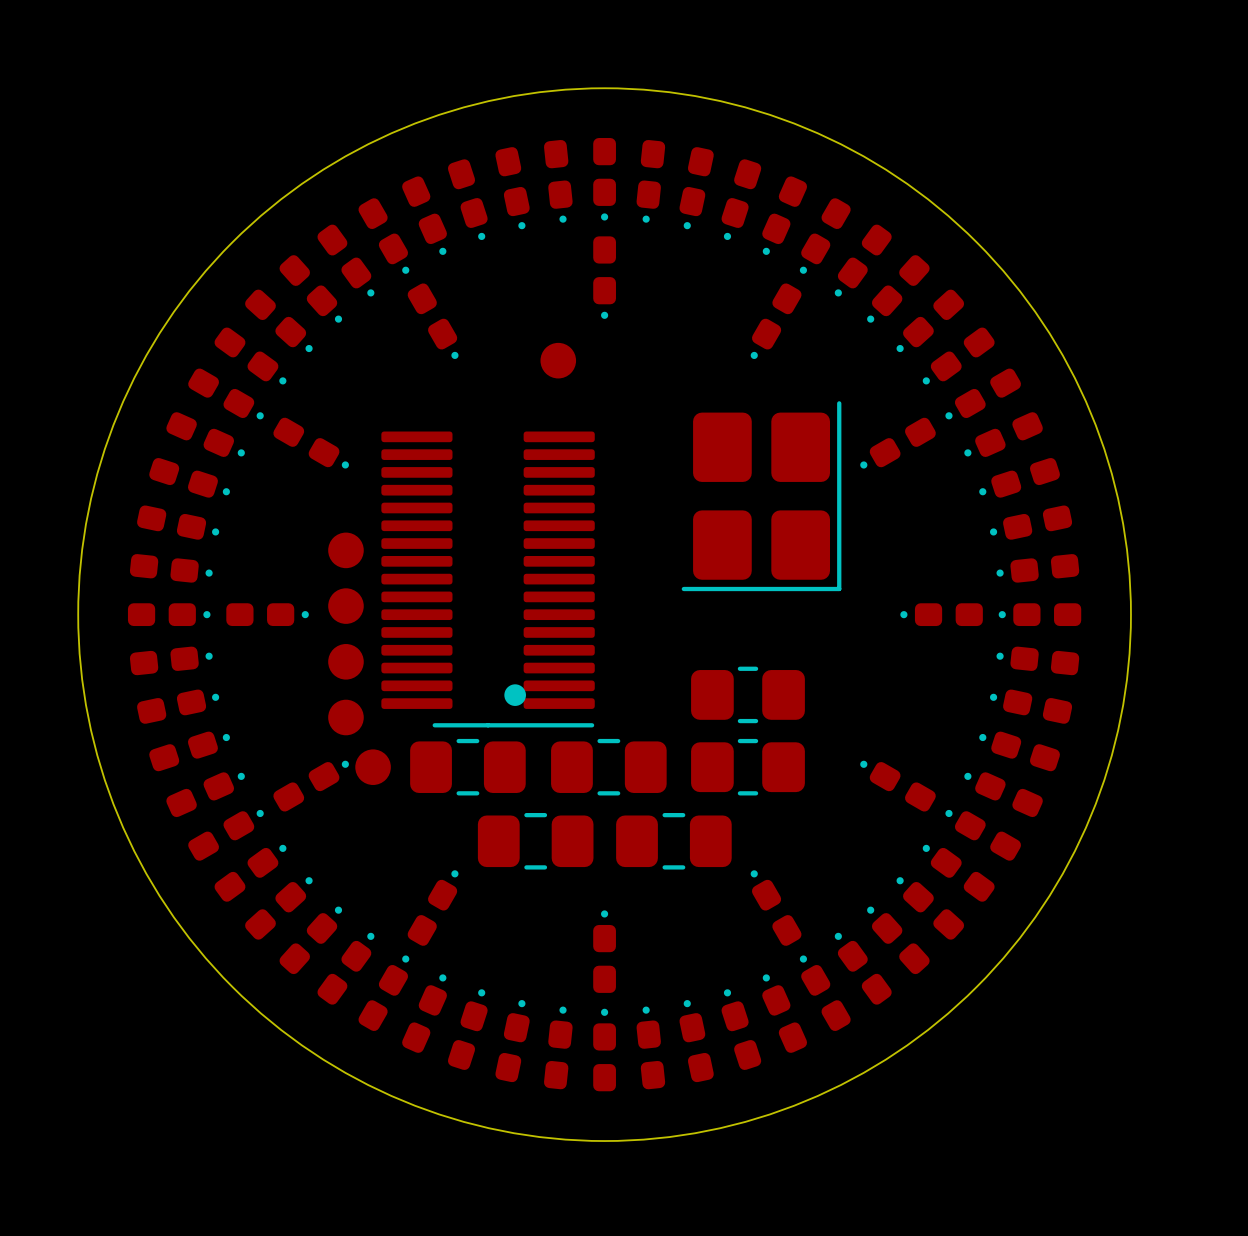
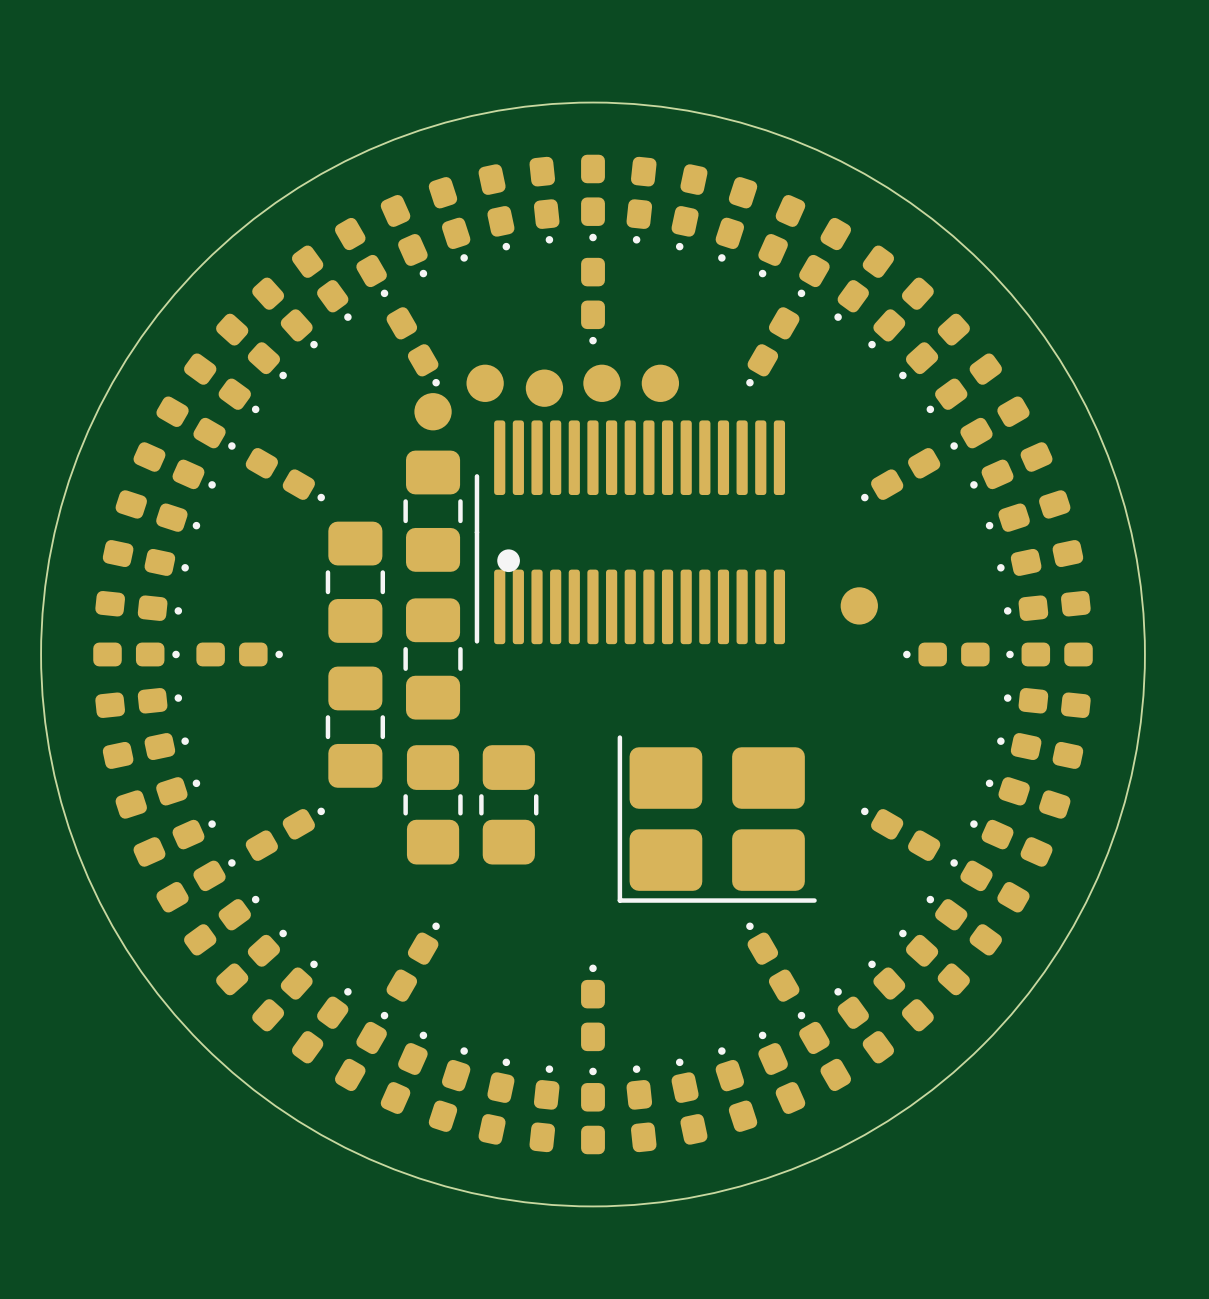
part: none -> (485, 383)
part: none -> (601, 383)
part: none -> (660, 383)
part: none -> (433, 411)
part: none -> (433, 511)
part: (761, 496) -> none
part footprint: [328, 532, 364, 569] -> [325, 521, 386, 643]
part: none -> (859, 605)
part rotation: 0° (488, 579) -> 90° clockwise (629, 532)
part: (345, 606) -> none
part: none -> (433, 658)
part: (345, 661) -> none
part: none -> (355, 727)
part rotation: 0° (747, 694) -> 90° clockwise (508, 804)
part position: (747, 694) -> (508, 804)
part: (345, 717) -> none
part footprint: [410, 738, 526, 796] -> [403, 745, 463, 865]
part footprint: [691, 738, 805, 796] -> [617, 735, 817, 903]
part: (373, 767) -> none
part: (608, 767) -> none
part: (535, 841) -> none
part: (673, 841) -> none

